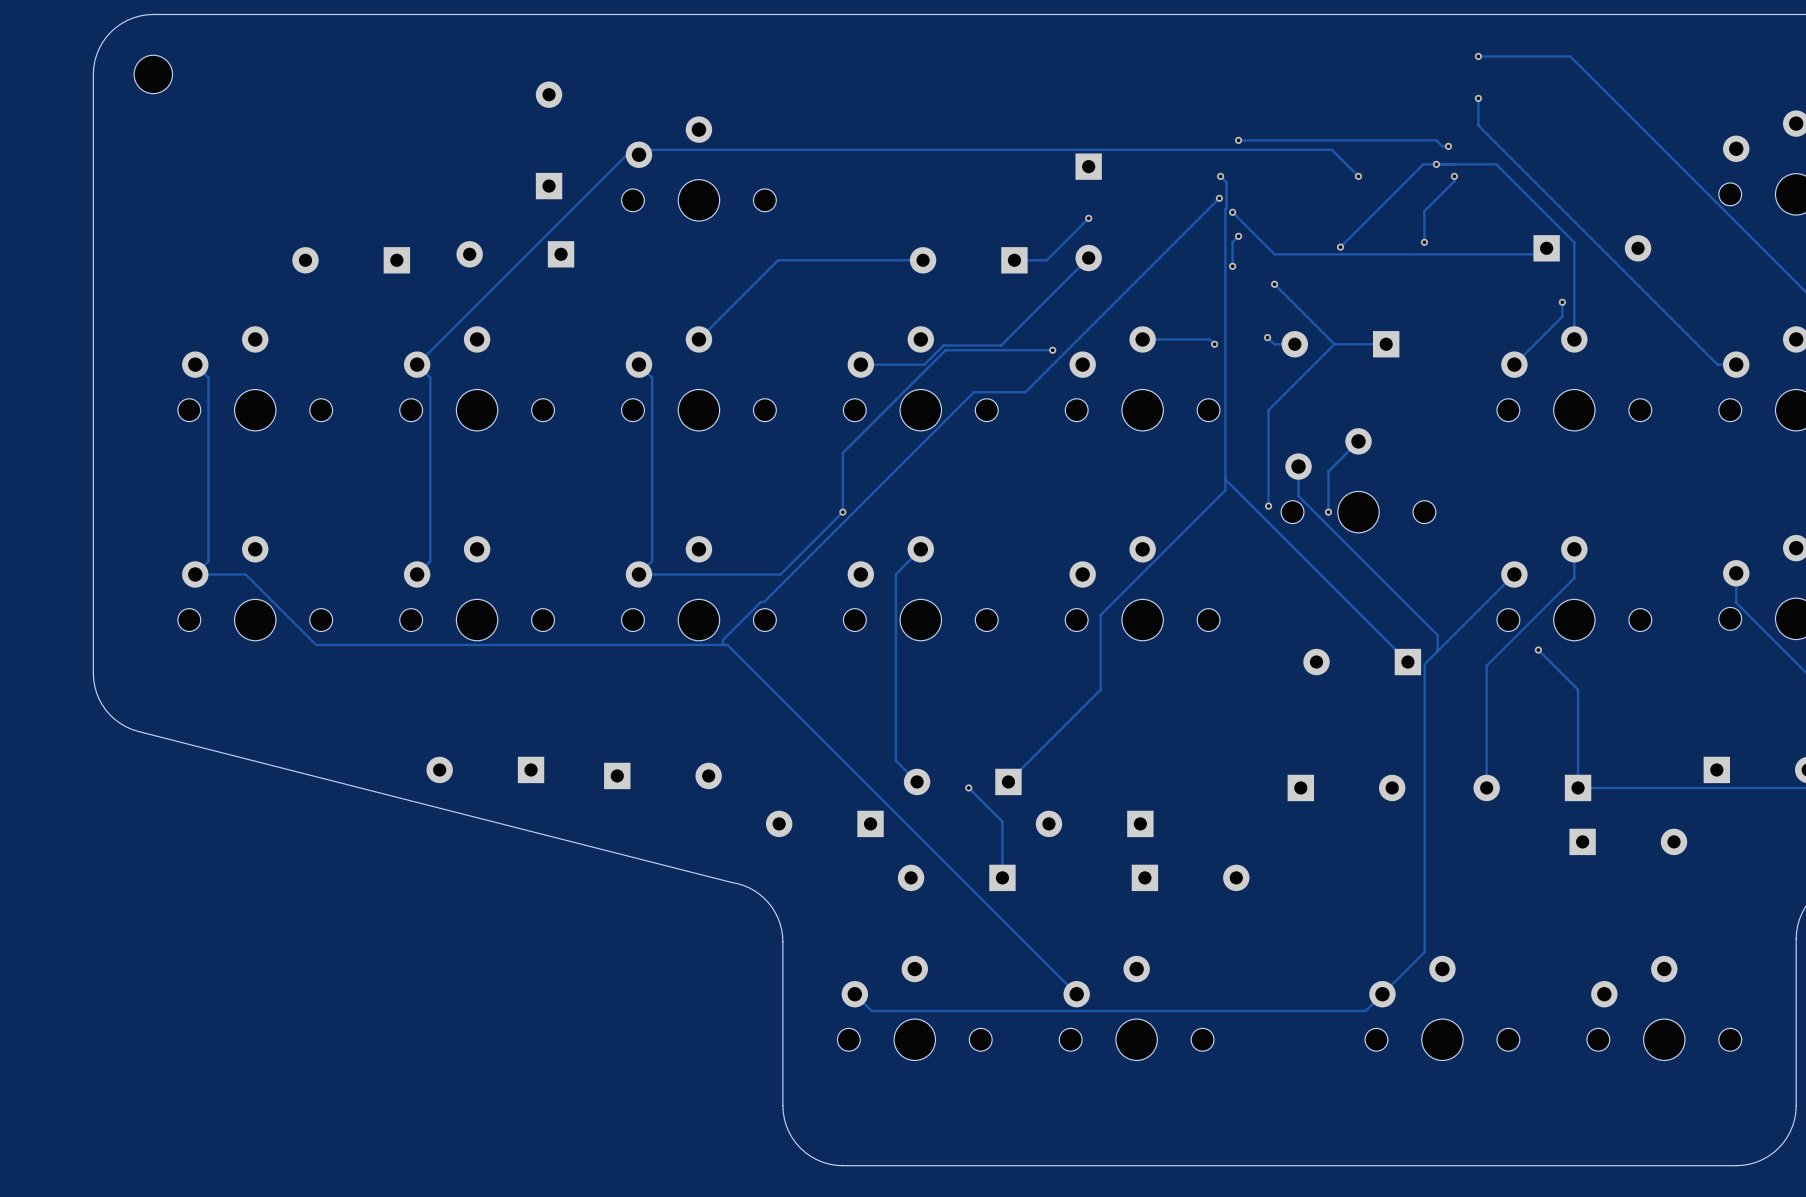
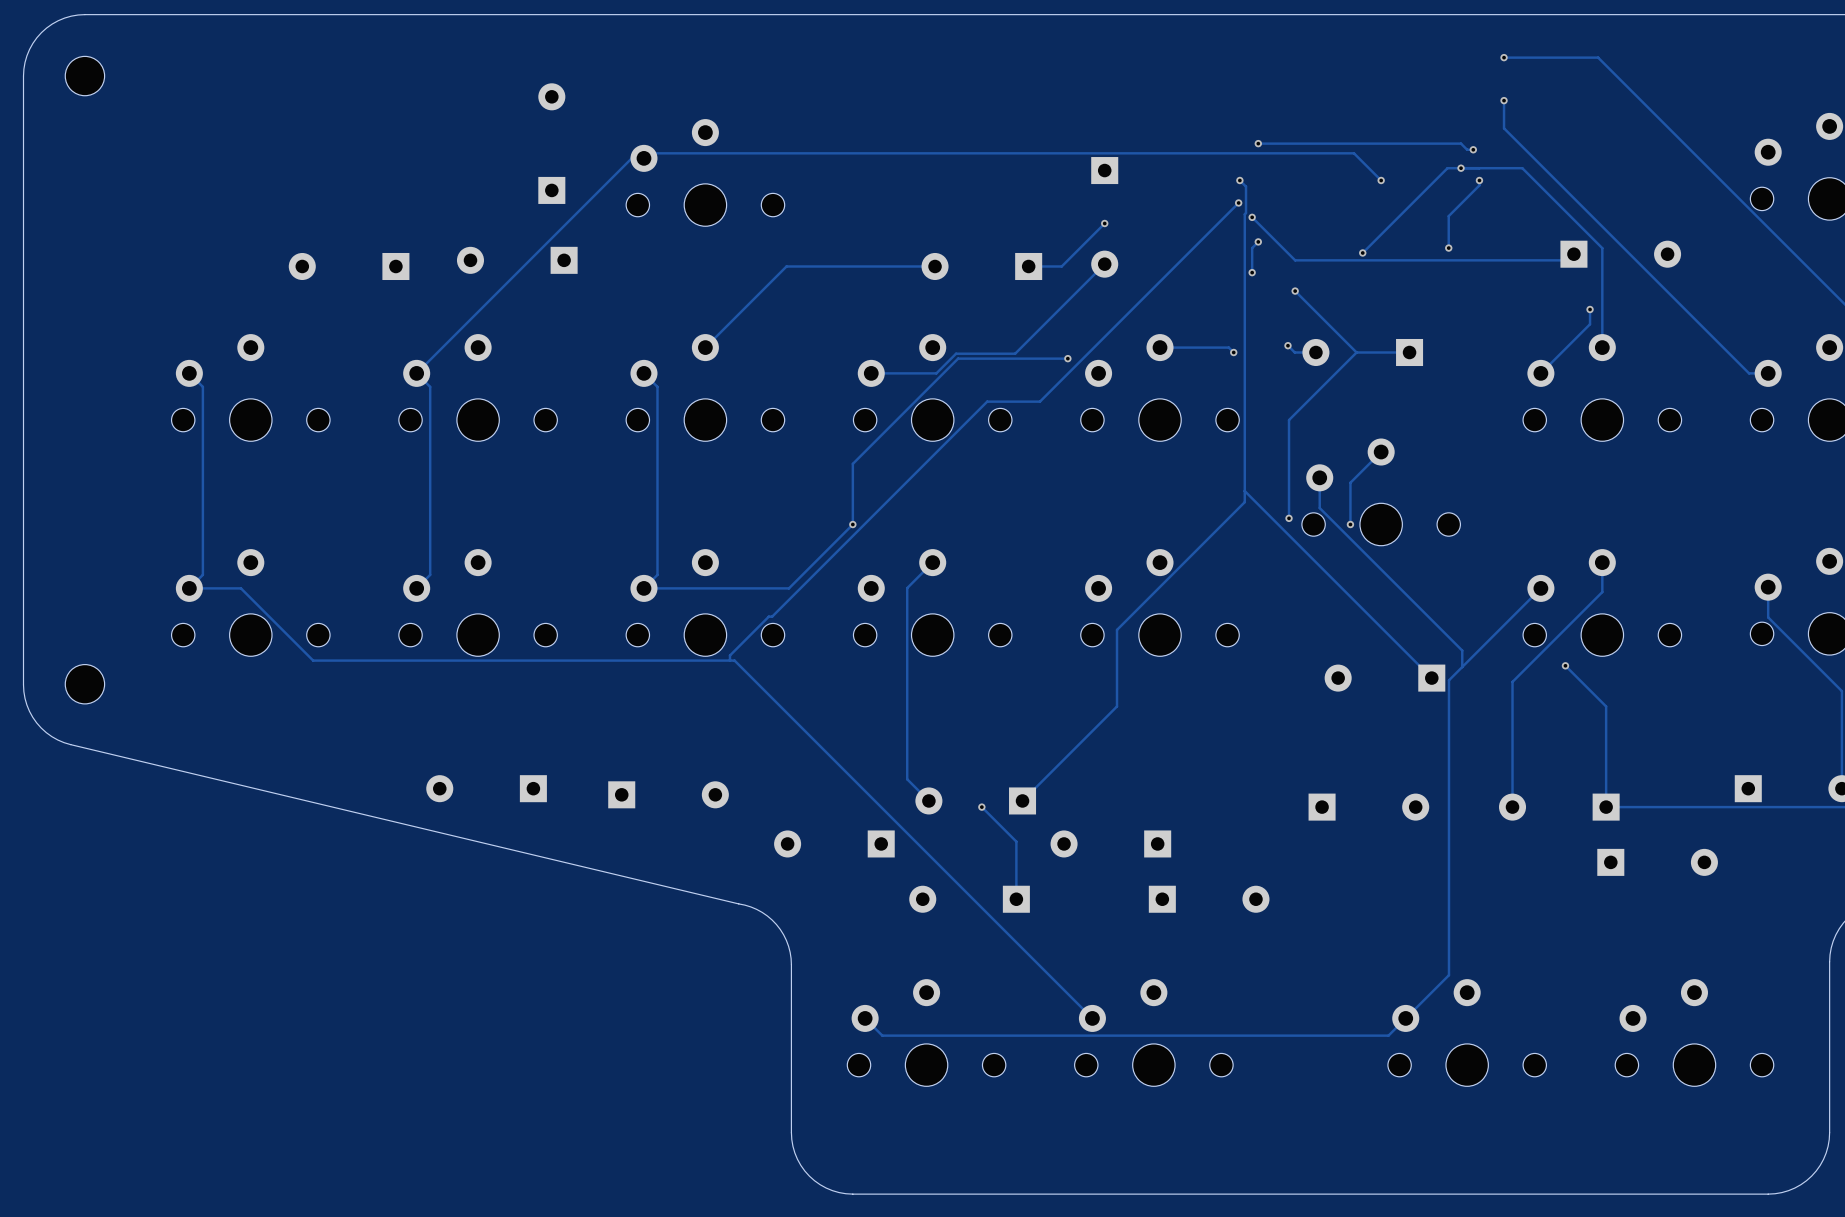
board edge: (153, 14) (133, 17) (115, 27) (102, 42) (96, 54) (93, 67) (93, 673) (96, 692) (102, 704) (120, 723) (138, 731) (731, 882) -> (146, 14) (78, 15) (58, 20) (46, 28) (32, 43) (26, 55) (23, 69) (23, 684) (26, 705) (32, 717) (46, 732) (57, 740) (70, 744) (738, 903)
part position: (153, 74) -> (84, 76)
part: none -> (84, 684)

